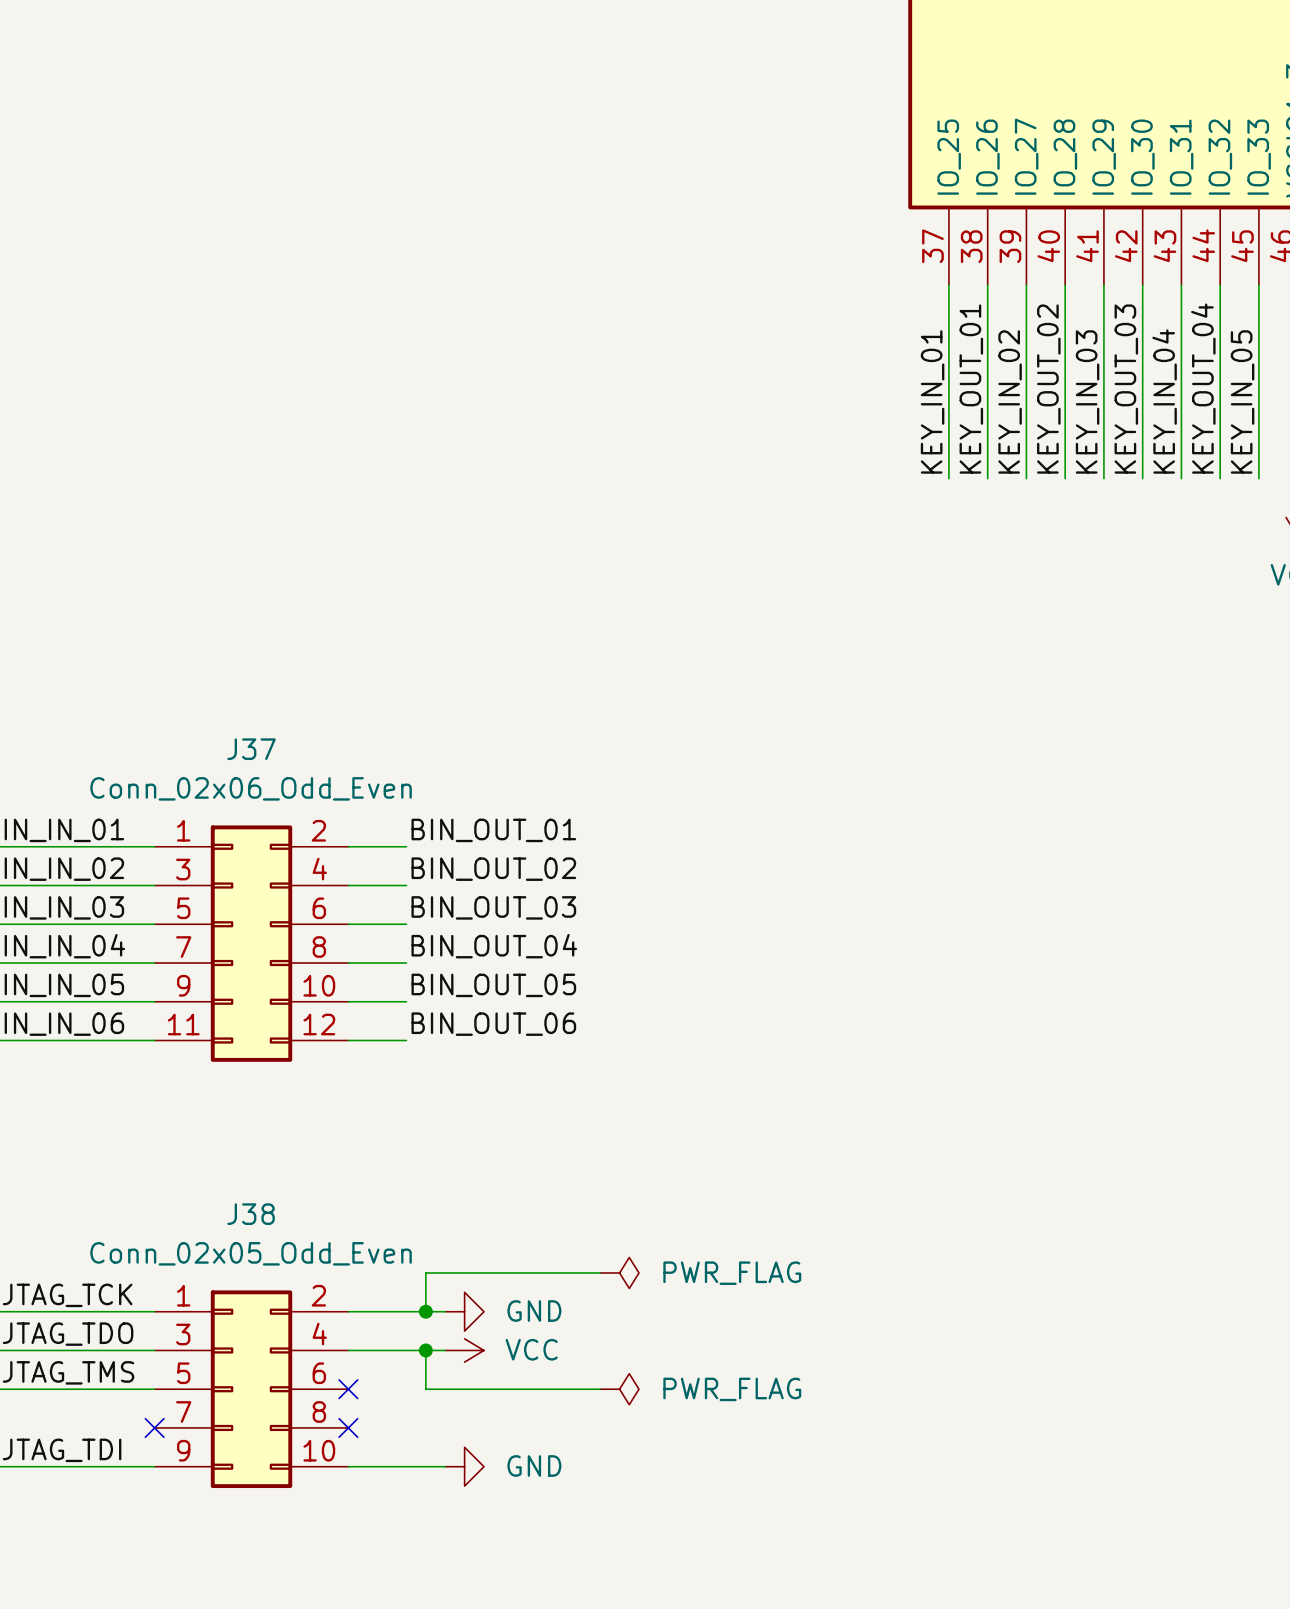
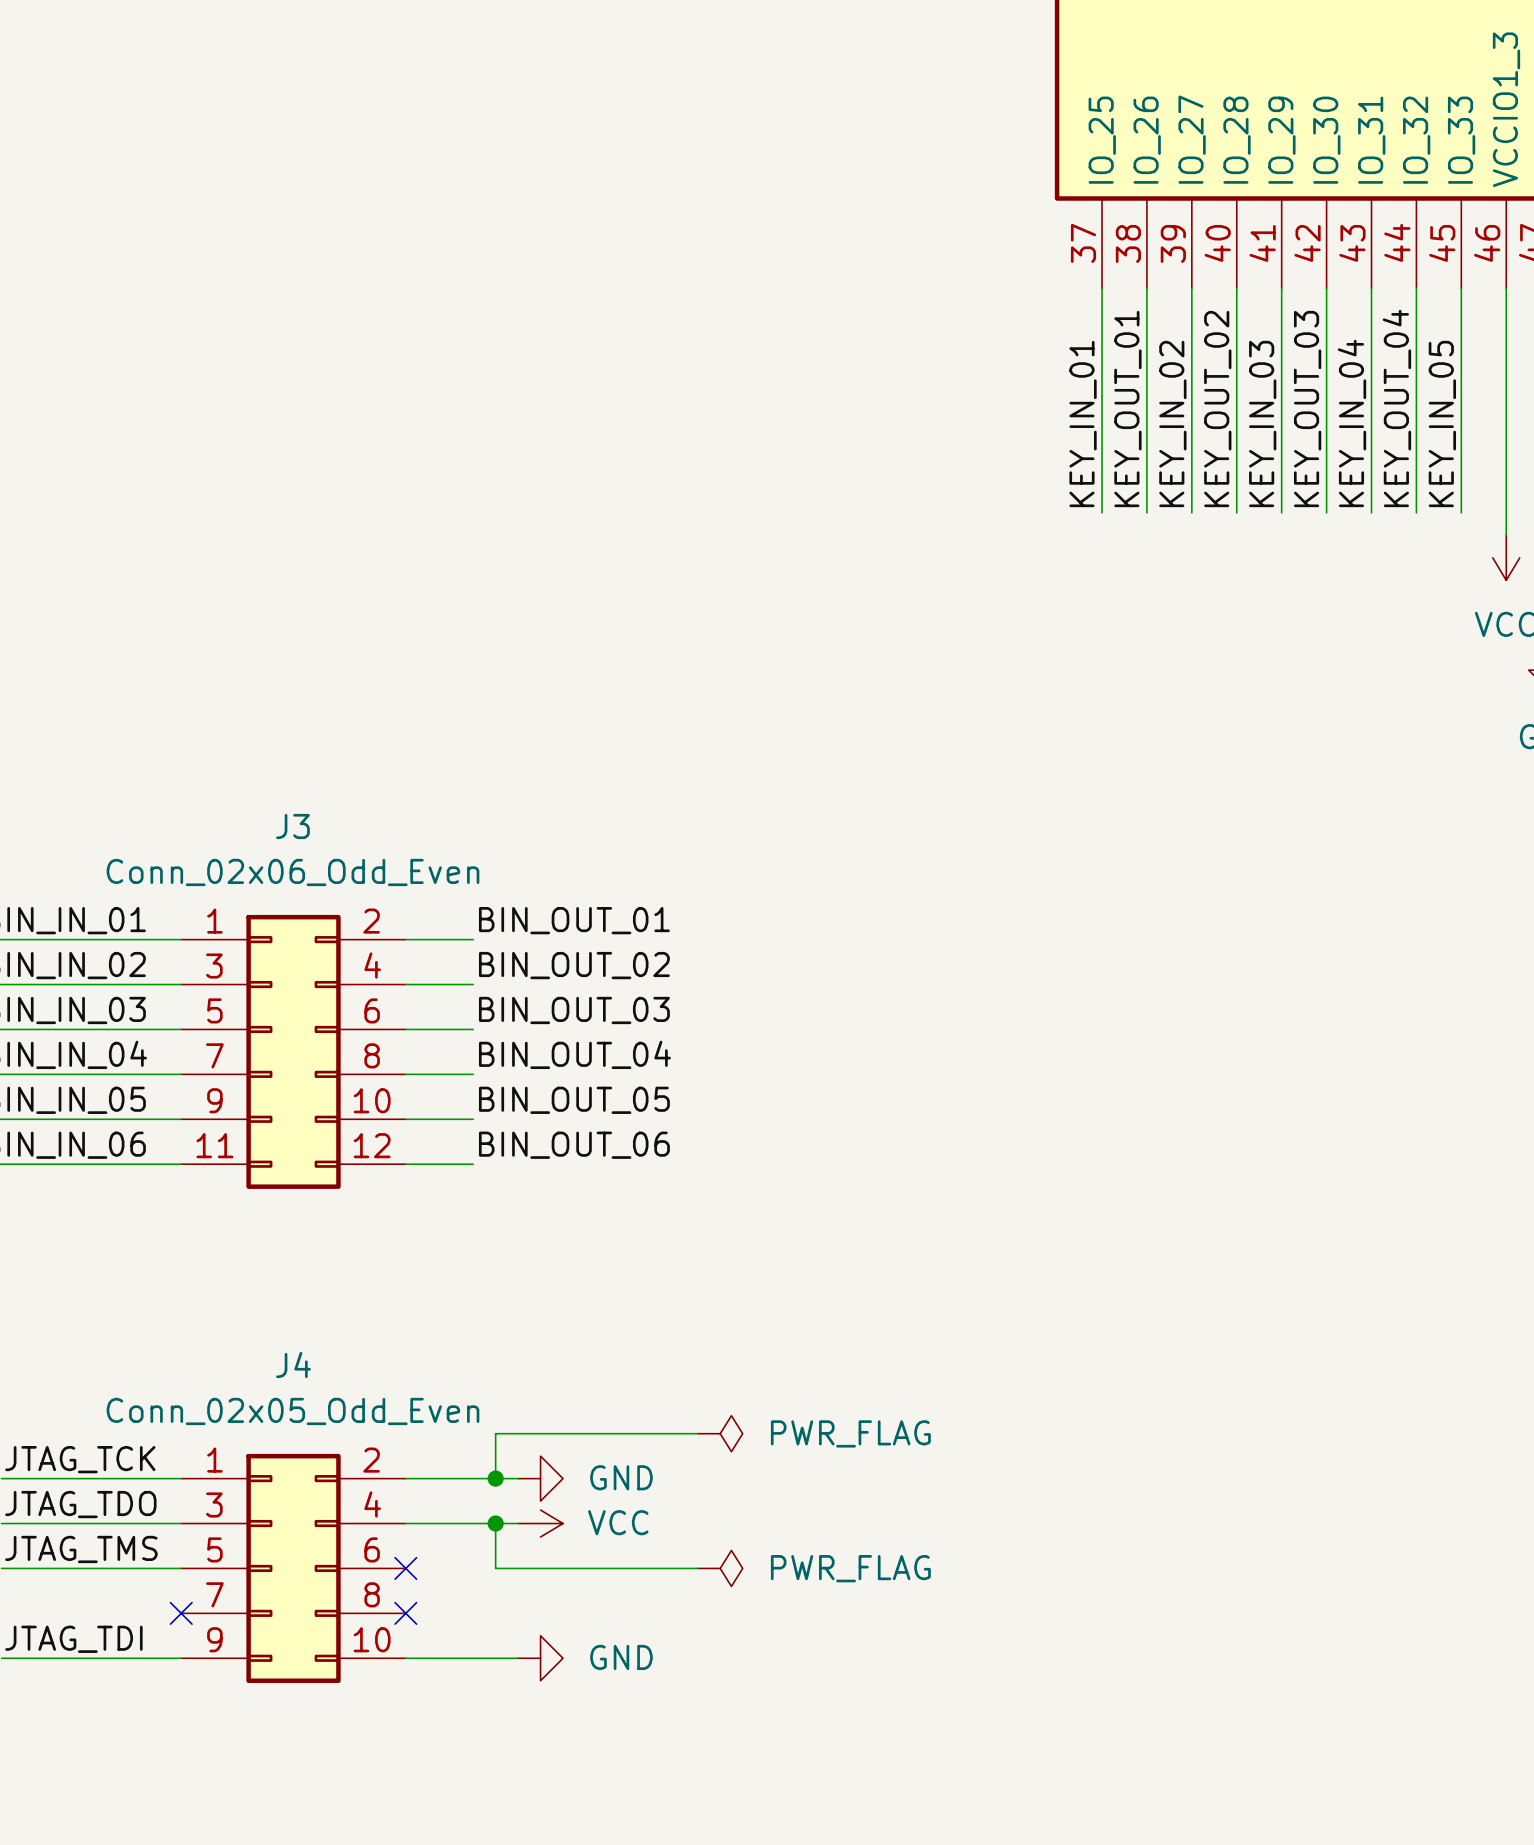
J37 name: J37 (251, 749) -> J3 (292, 826)
J38 name: J38 (251, 1214) -> J4 (293, 1364)

